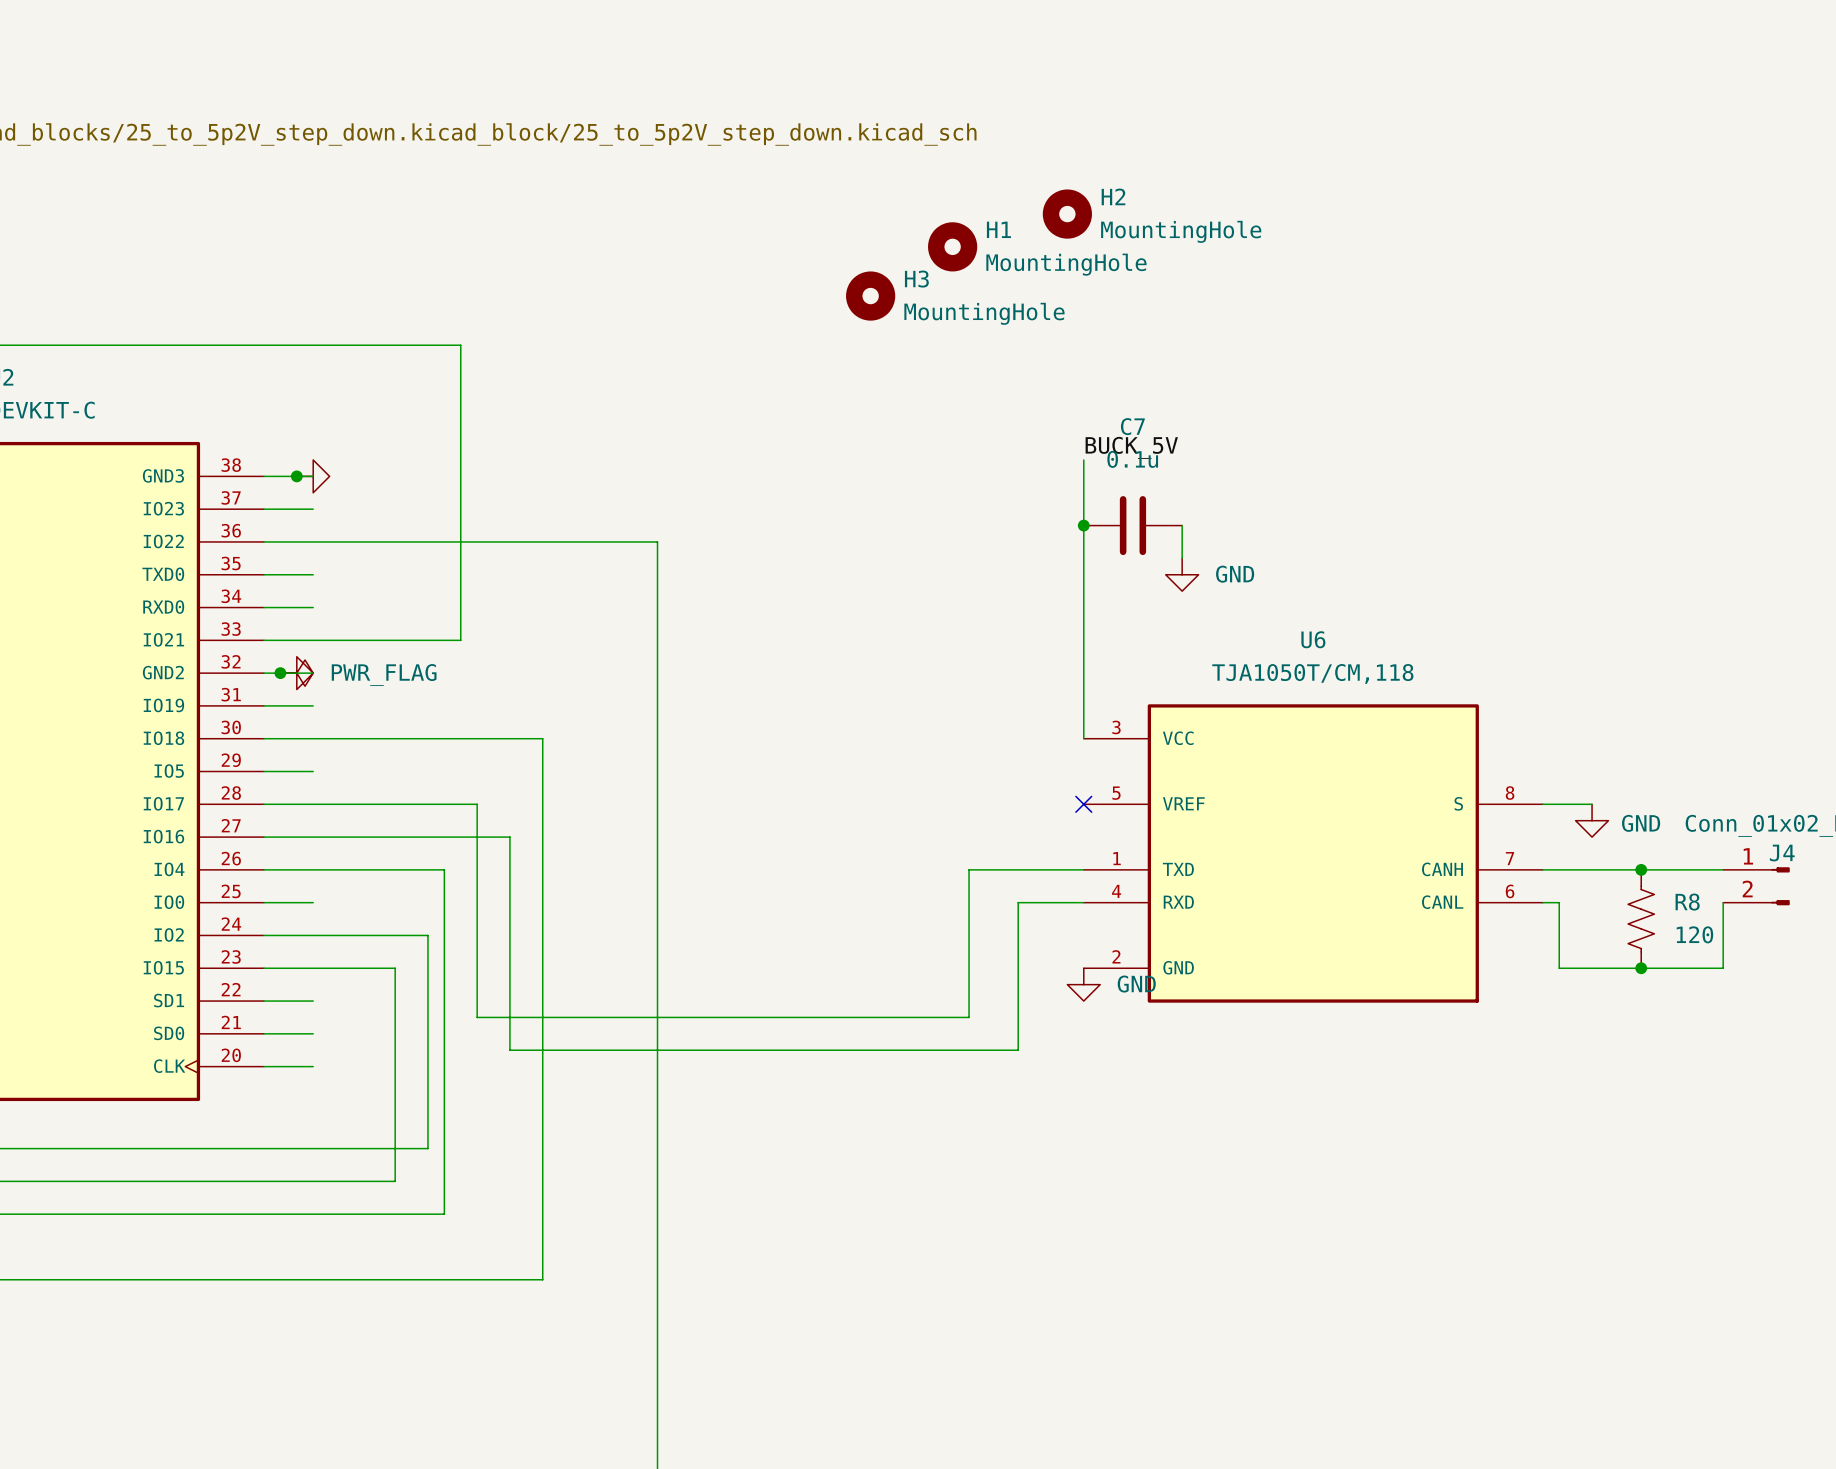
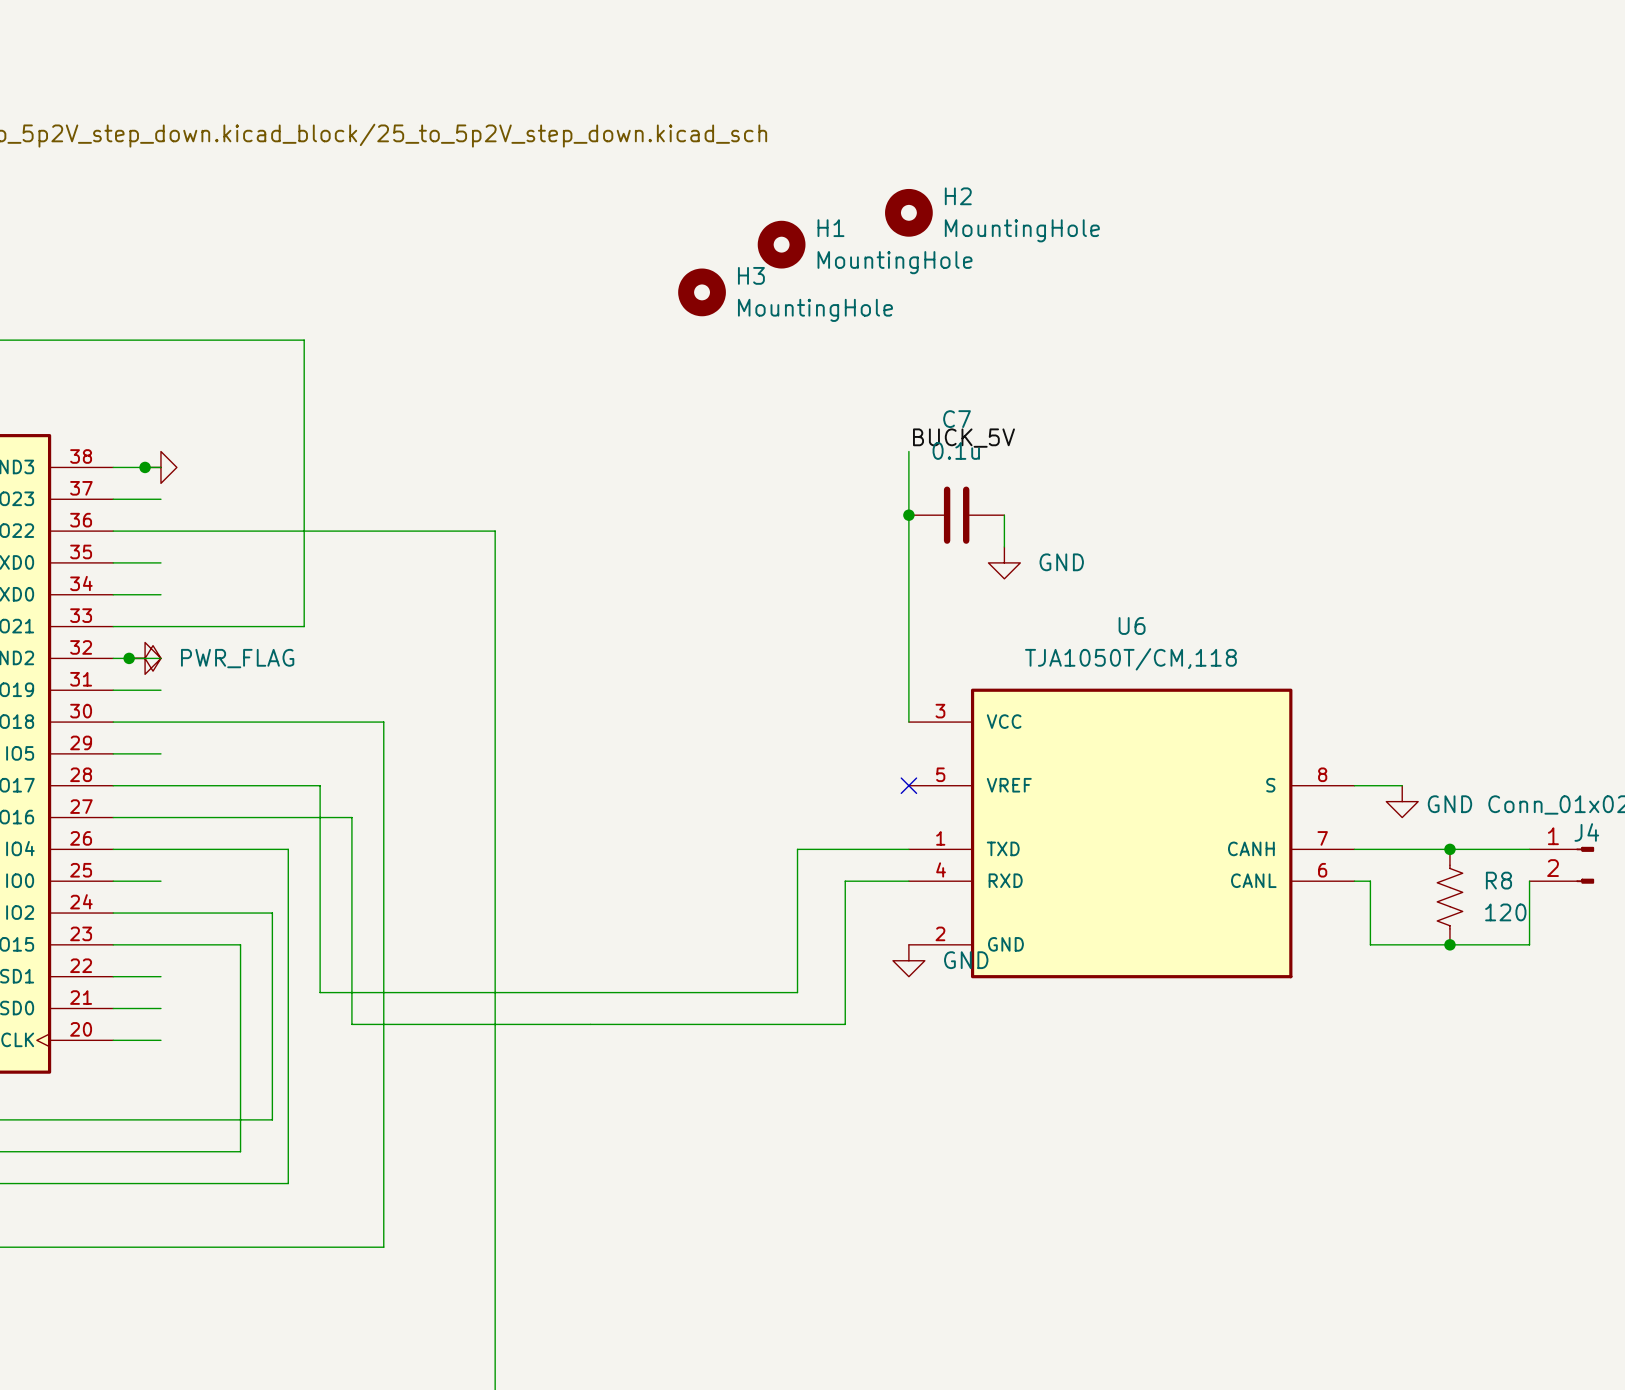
H2 position: (1067, 214) -> (908, 212)

